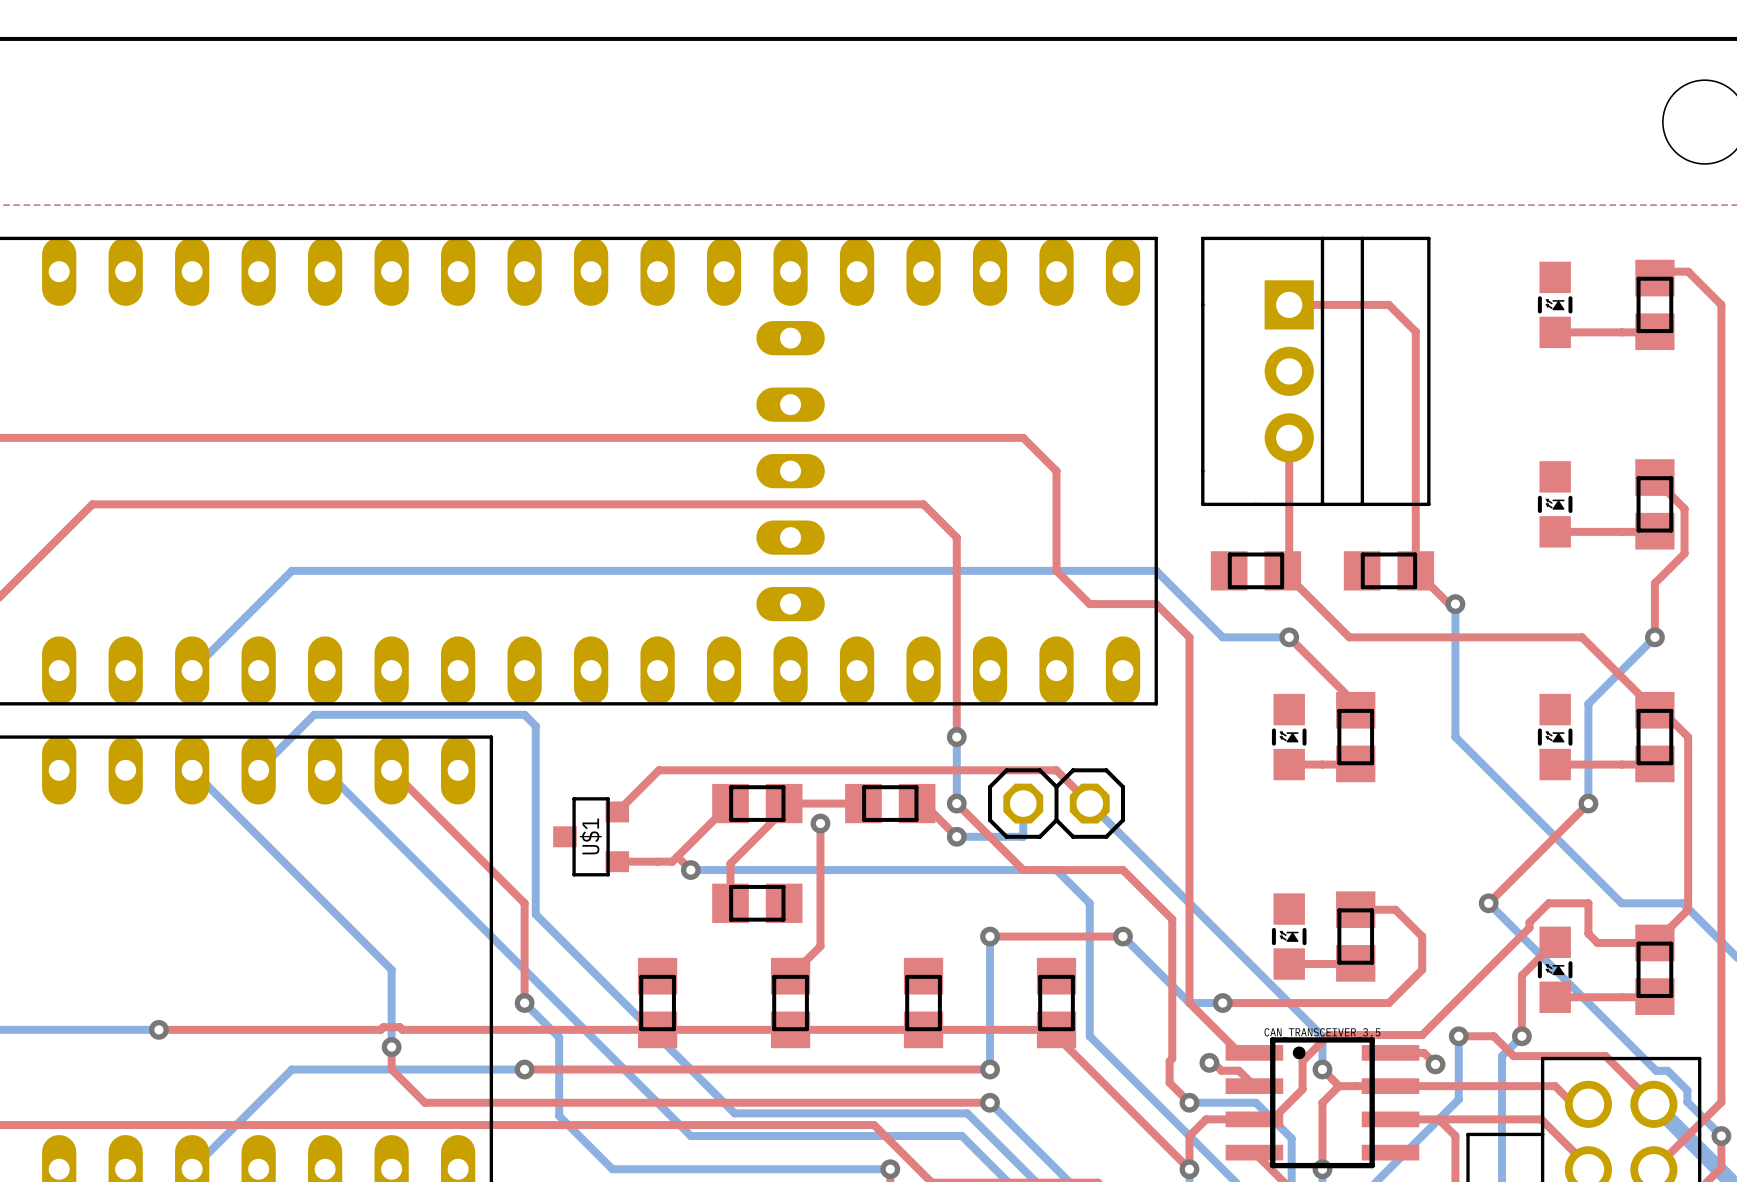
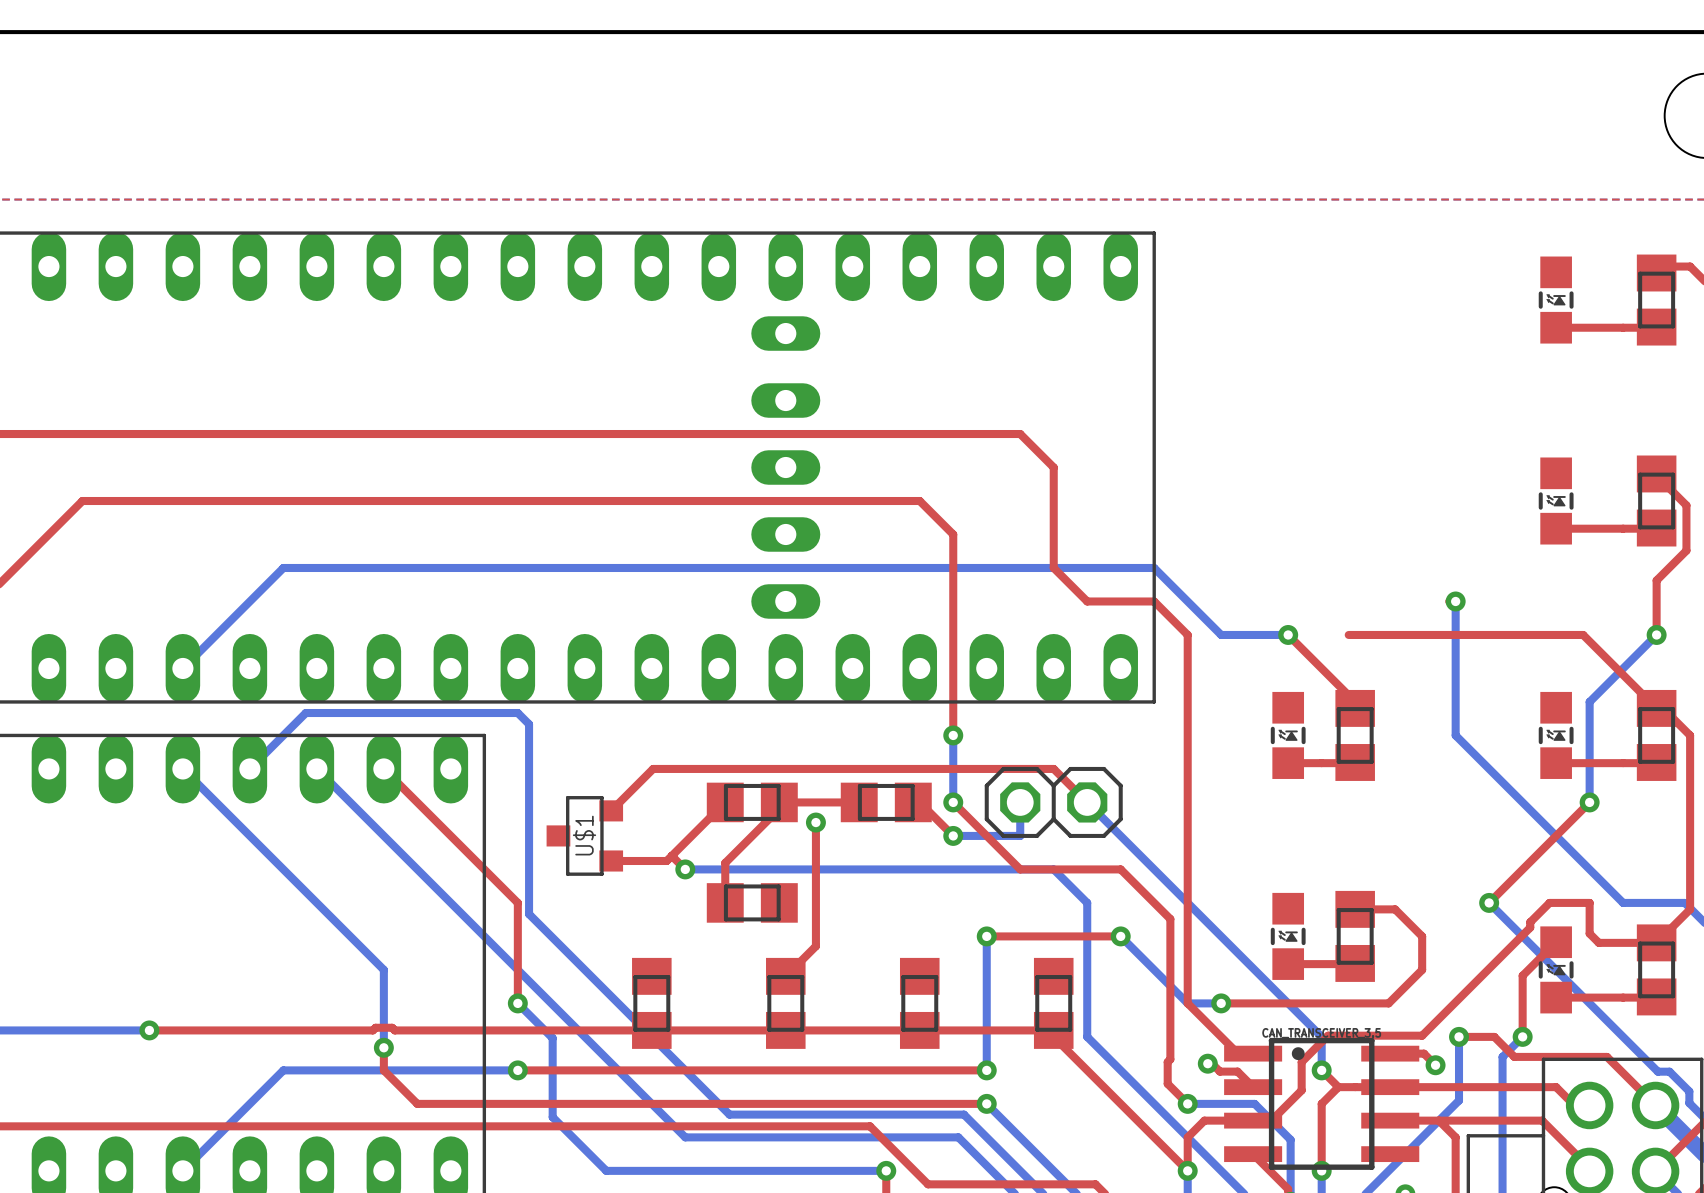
top track: (1289, 304) (1388, 304) (1415, 331) (1415, 570) (1449, 604) -> none
part: (1315, 371) -> none
top track: (1289, 437) (1289, 564) (1282, 570) (1349, 637) -> none
part: (1255, 570) -> none
part: (1388, 570) -> none

